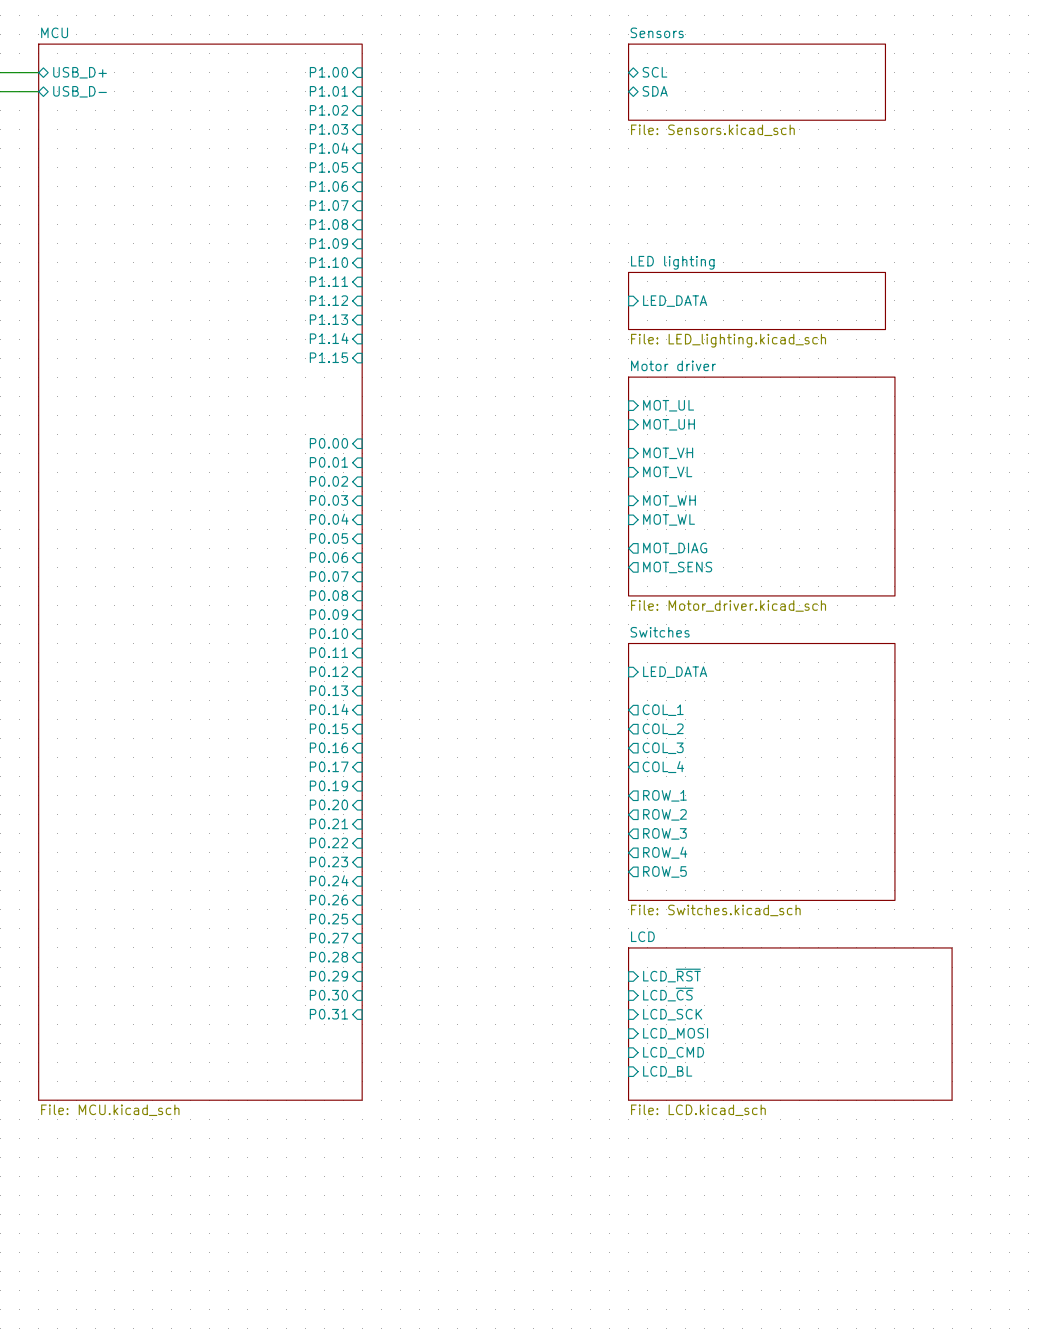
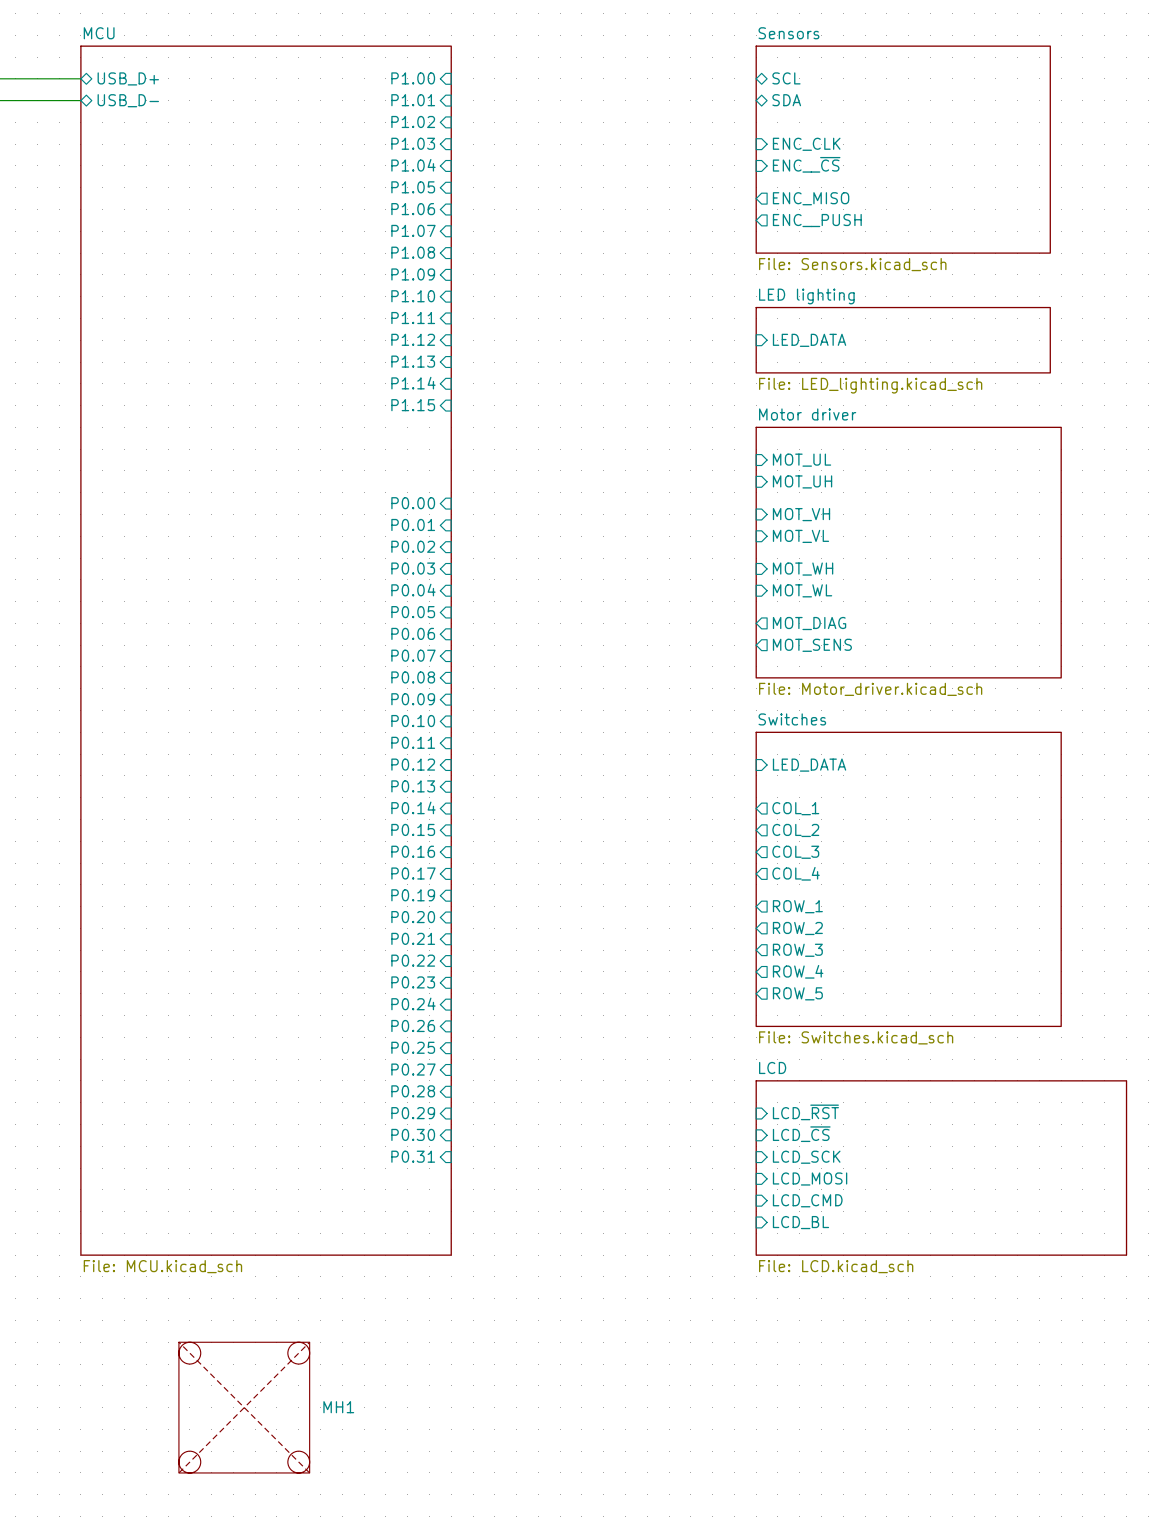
sheet Sensors: File: Sensors.kicad_sch (757, 82) -> none
sheet pin: none -> ENC_CLK (806, 144)
sheet Sensors: none -> File: Sensors.kicad_sch (903, 149)
sheet pin: none -> ENC__~{CS} (806, 164)
sheet pin: none -> ENC_MISO (811, 198)
sheet pin: none -> ENC__PUSH (817, 220)
MH1: none -> (244, 1407)

